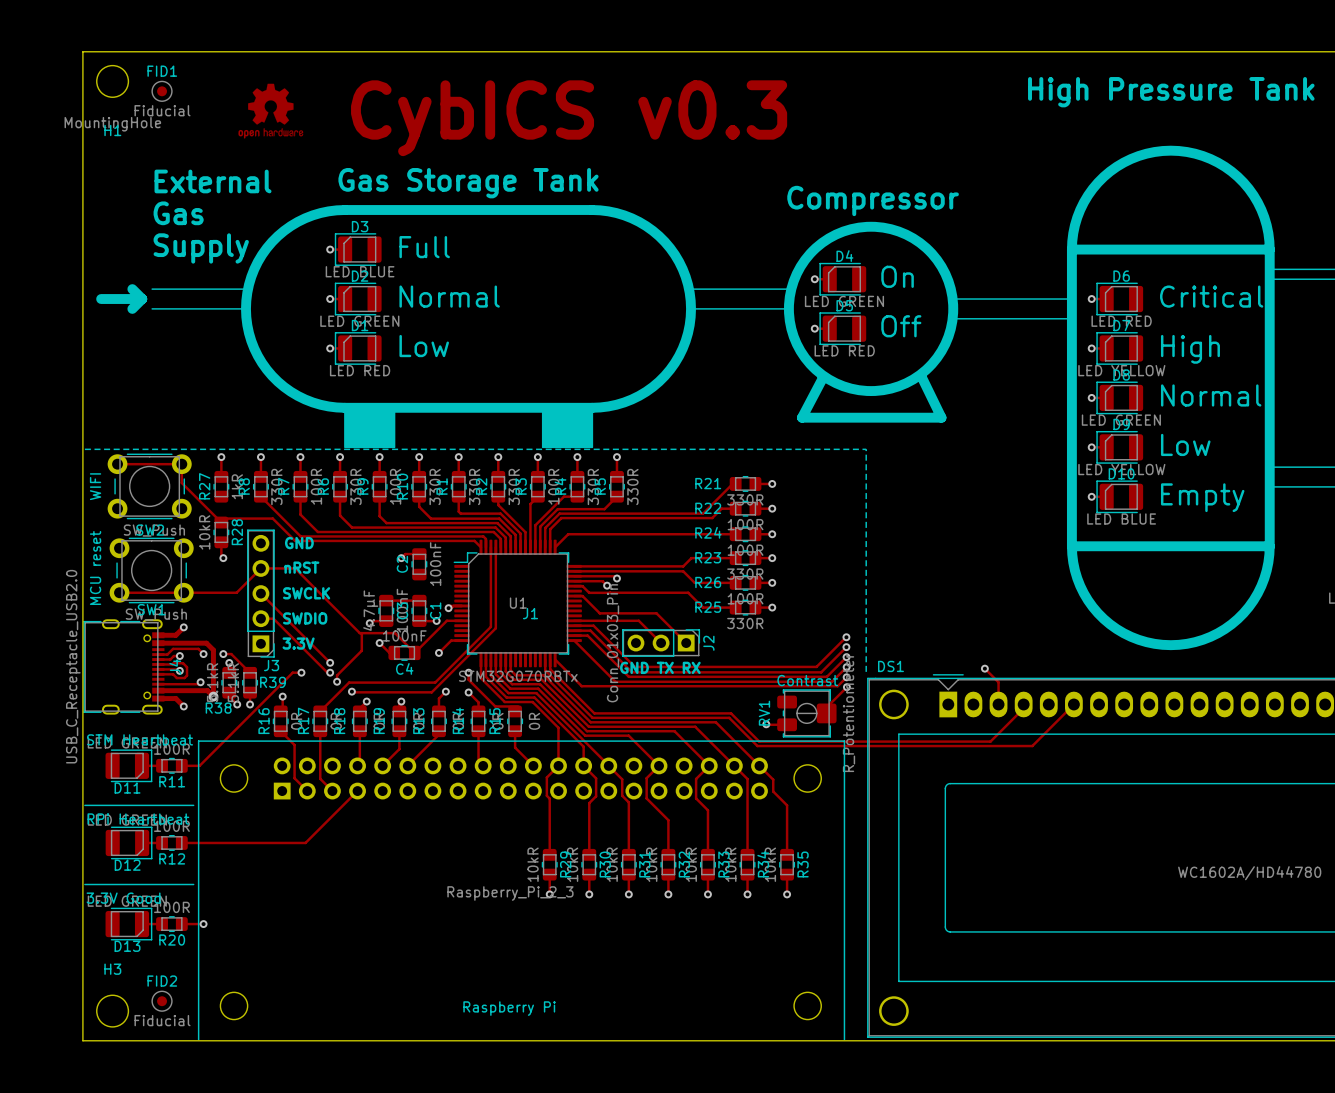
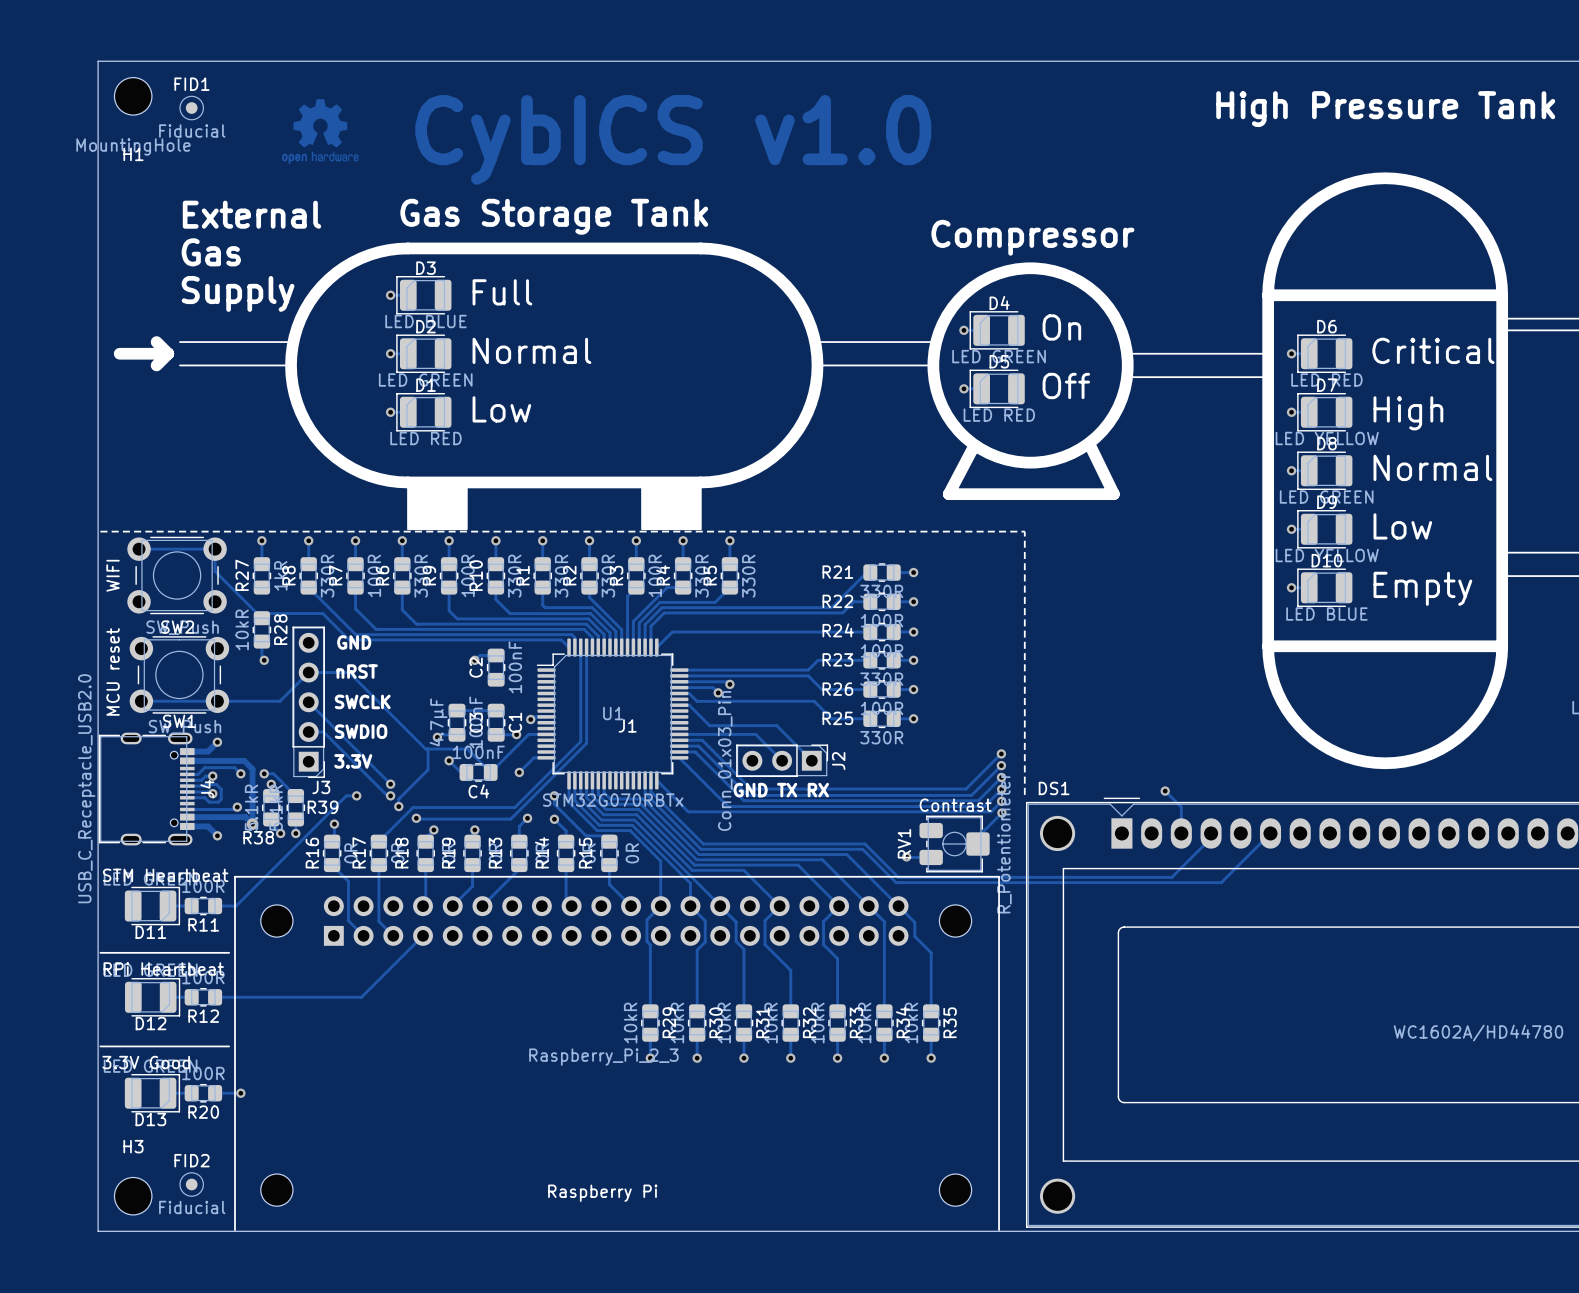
text: CybICS v0.3 (569, 118) -> CybICS v1.0 (673, 139)

